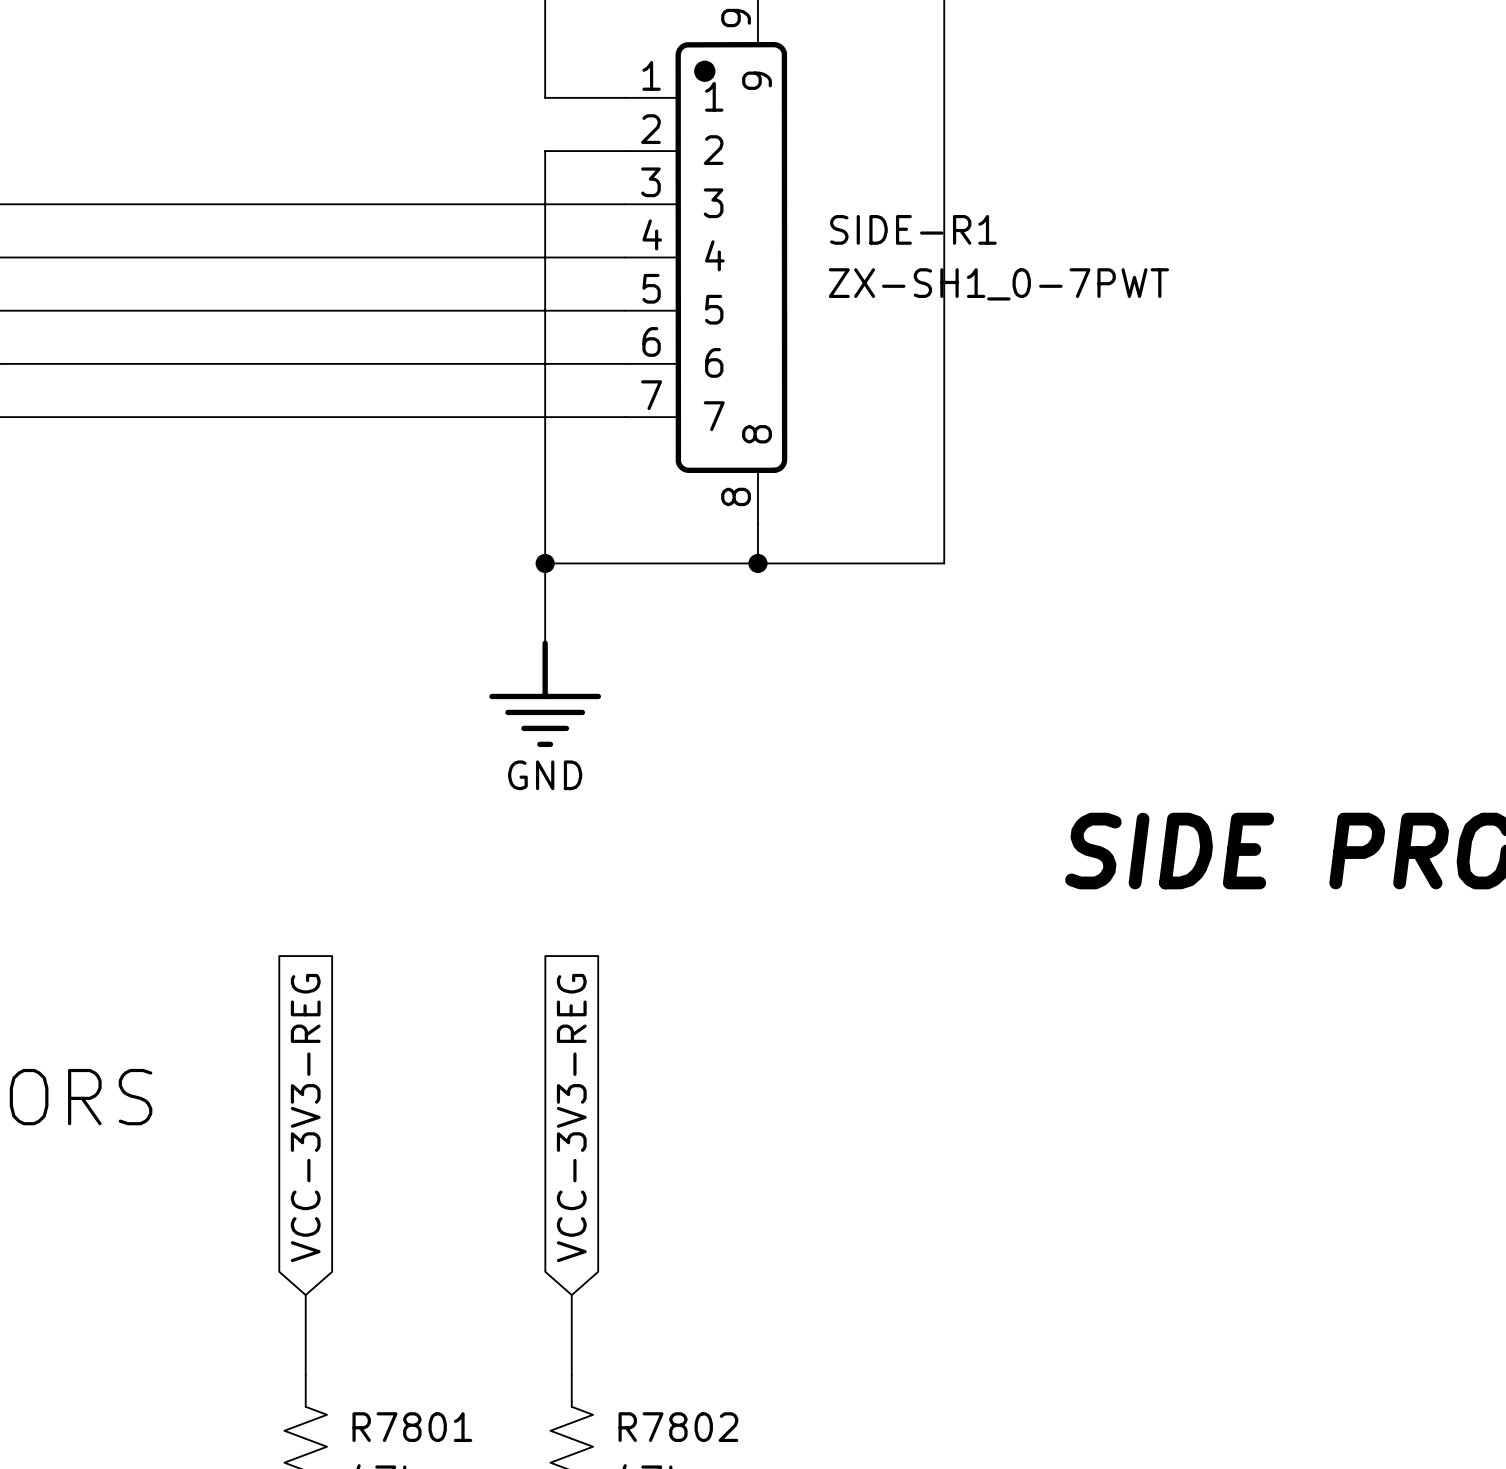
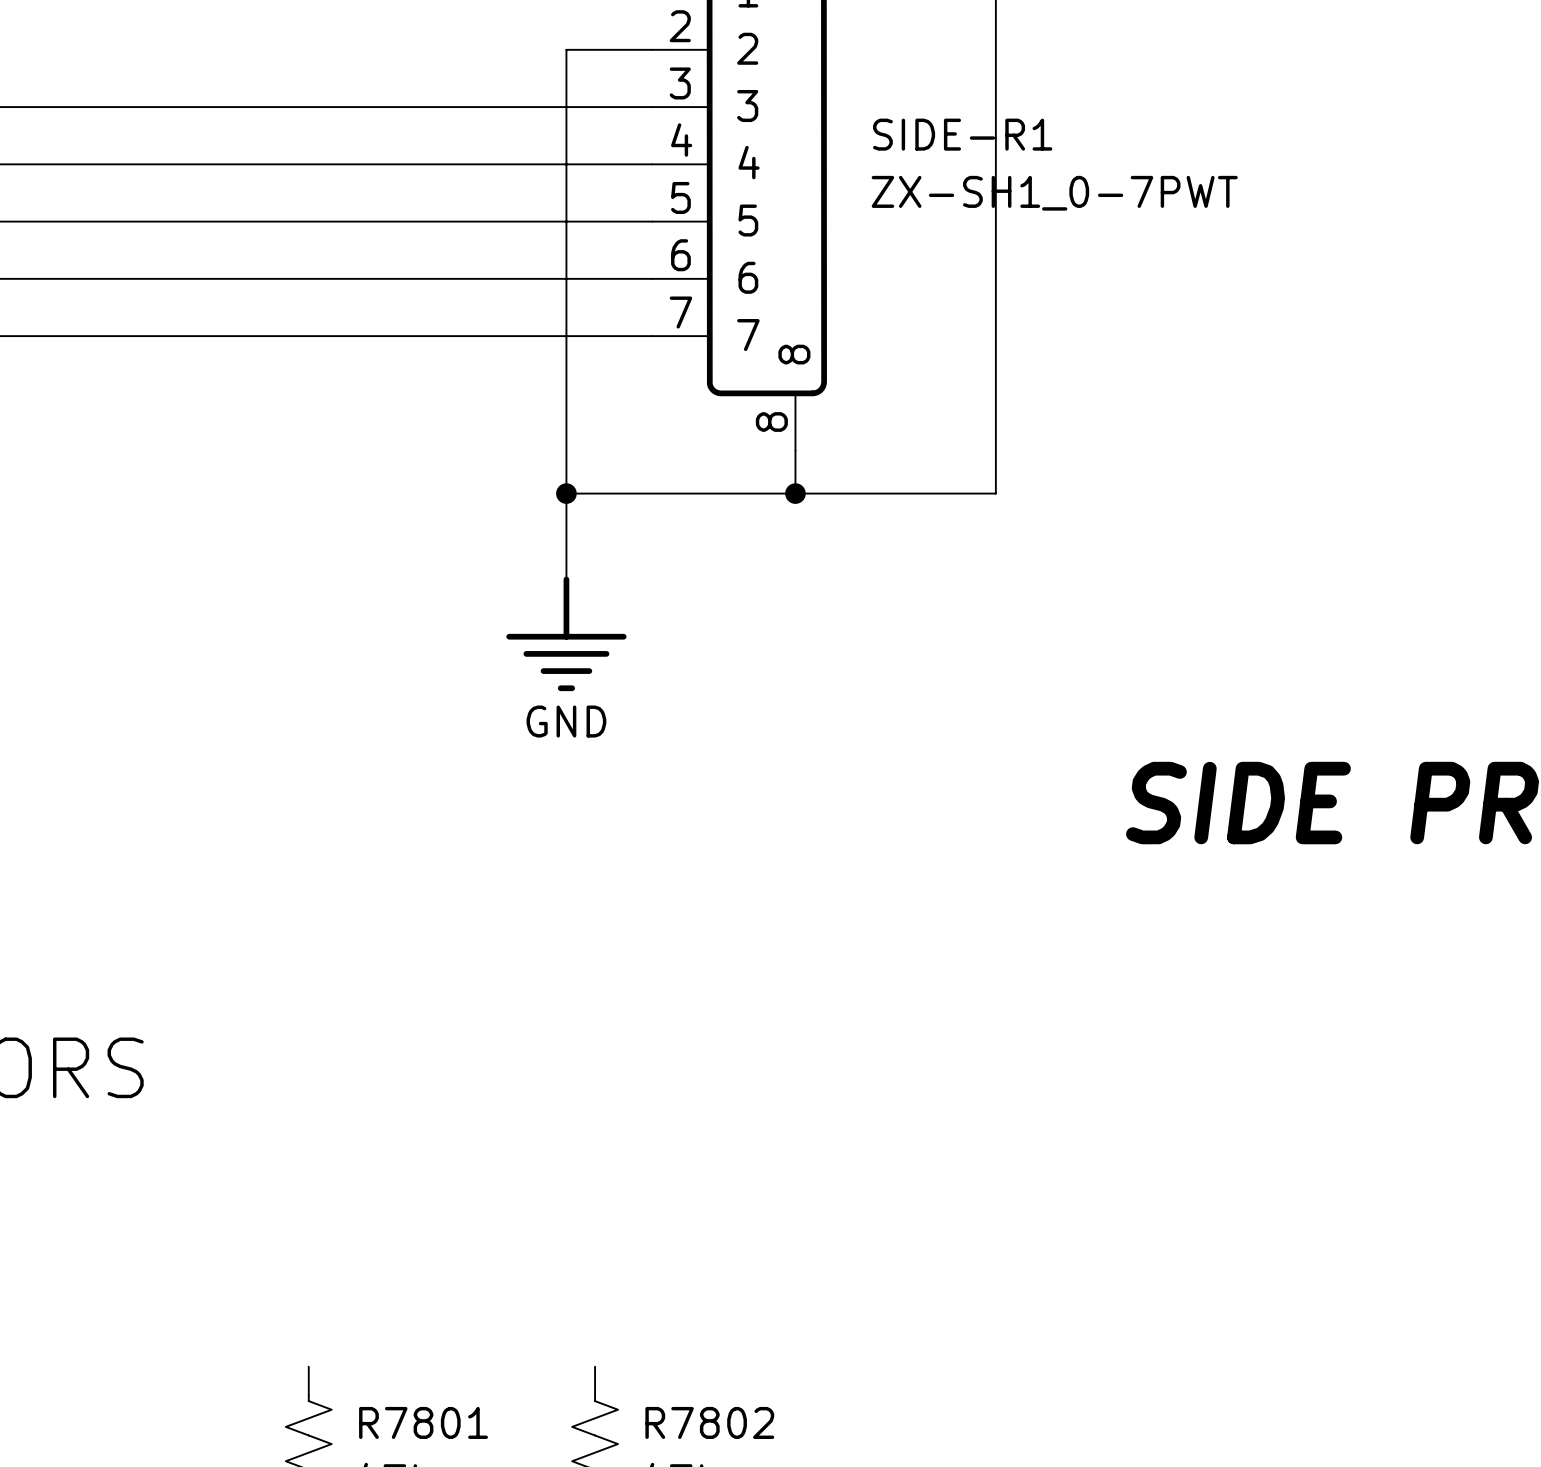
global label: VCC-3V3-REG (305, 1117) -> none
global label: VCC-3V3-REG (571, 1117) -> none
wire: (305, 1295) (305, 1374) -> none
wire: (571, 1295) (571, 1374) -> none

